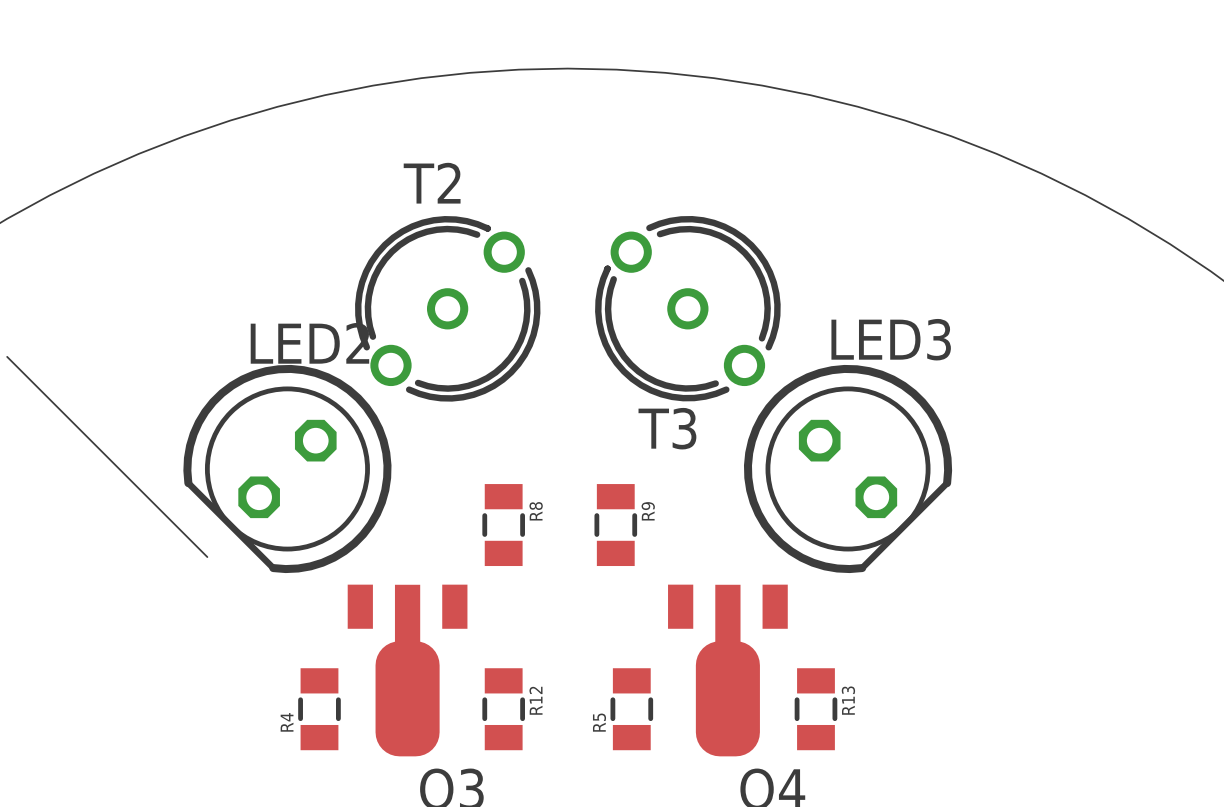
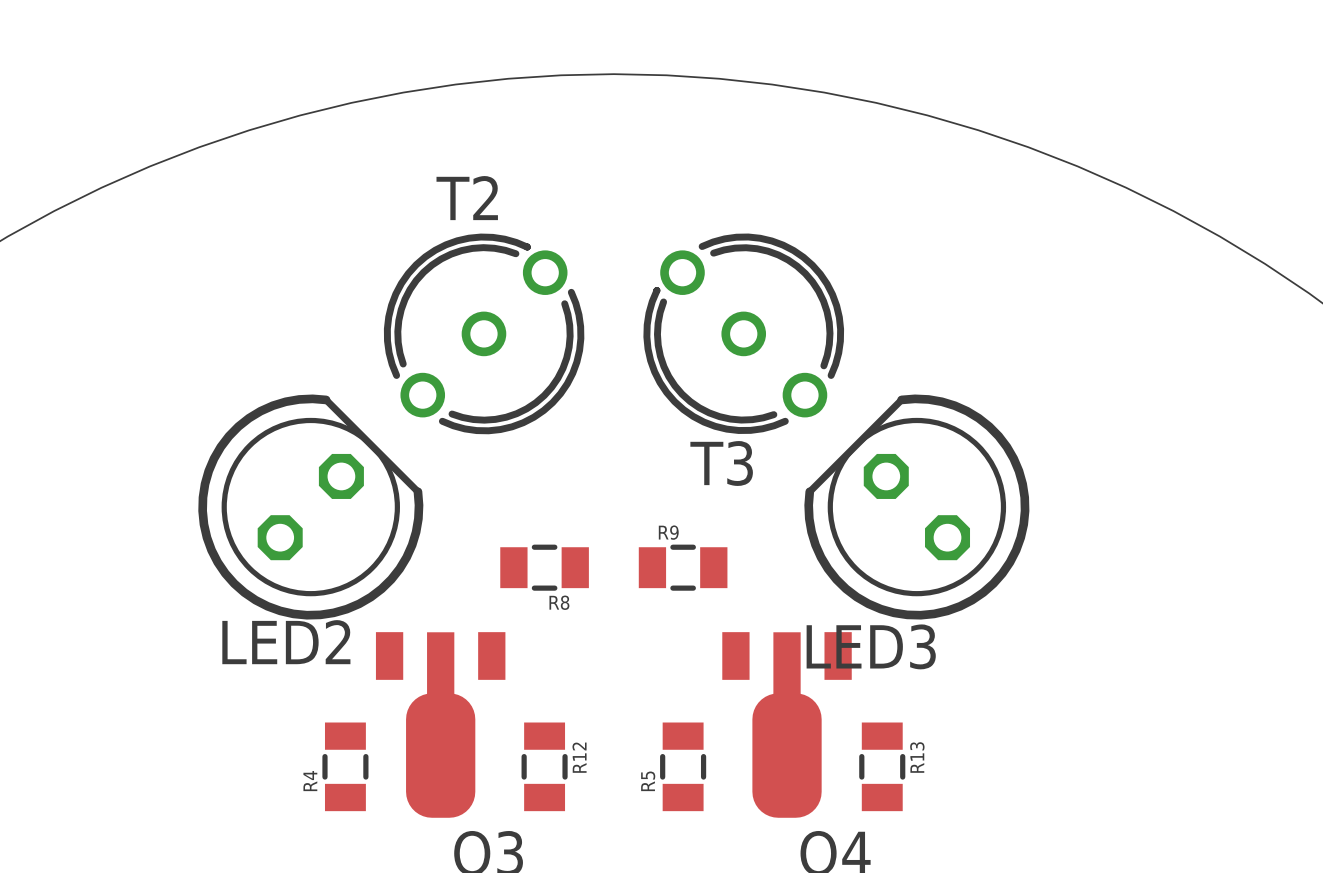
line: (7, 356) (207, 557) -> none
LED2 rotation: 0° (287, 469) -> 180° (310, 507)
LED3 rotation: 0° (848, 469) -> 180° (916, 507)
R8 rotation: 0° (503, 525) -> 90° clockwise (544, 567)
R9 rotation: 0° (615, 525) -> 90° clockwise (683, 567)

